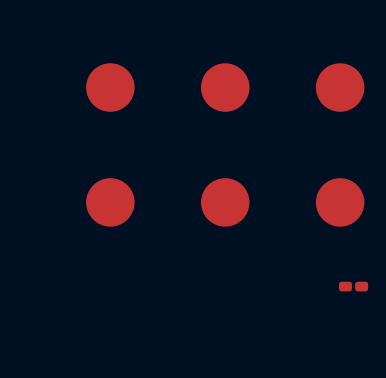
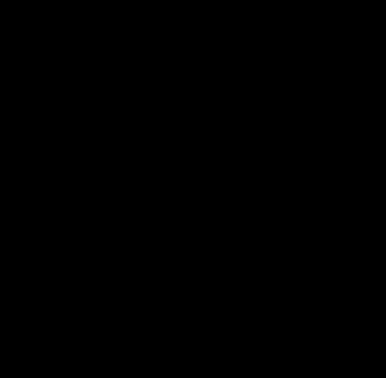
part: (110, 87) -> none
part: (225, 87) -> none
part: (340, 87) -> none
part: (110, 202) -> none
part: (225, 202) -> none
part: (340, 202) -> none
part: (353, 286) -> none

